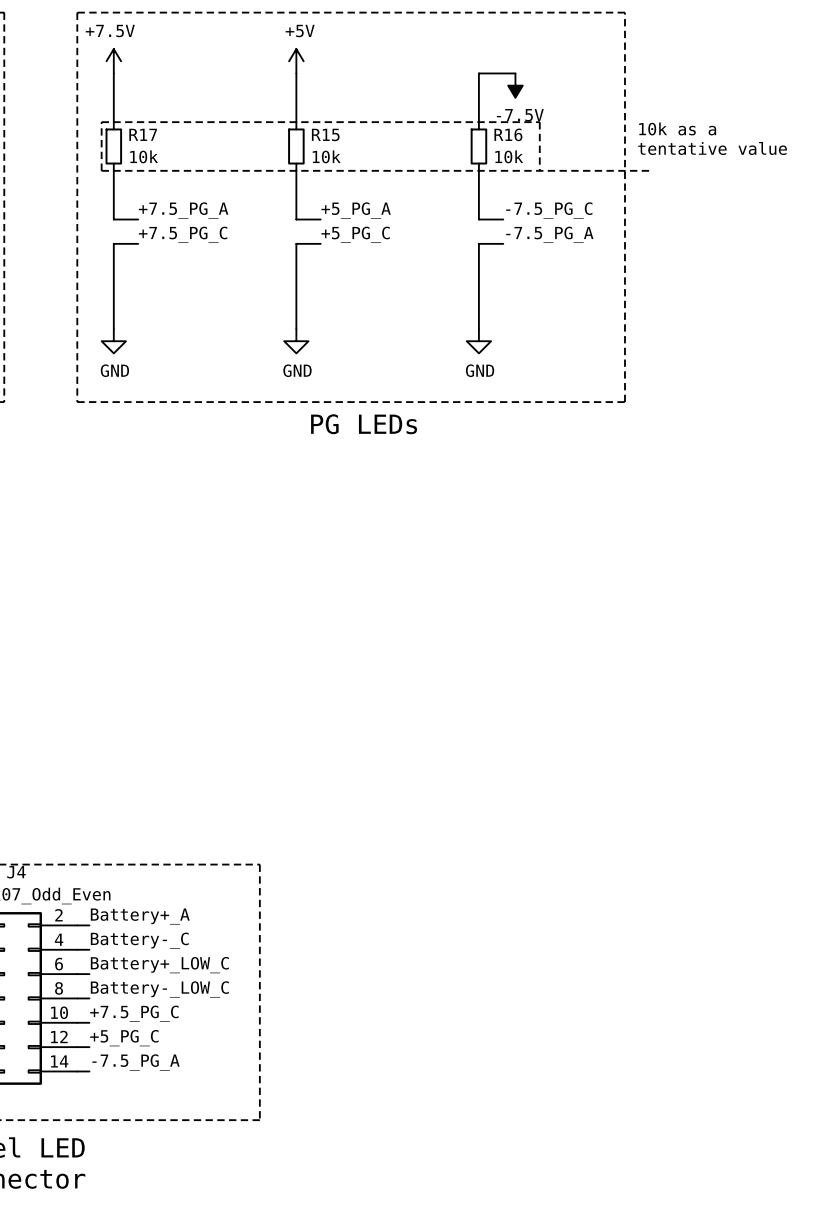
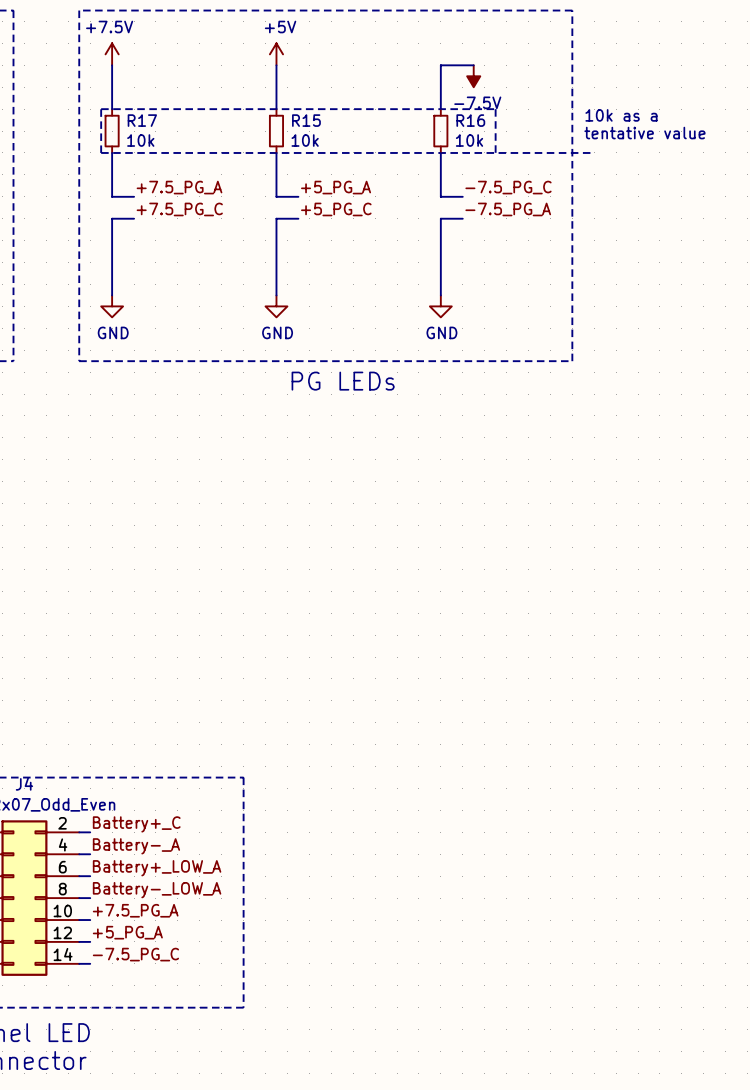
label: Battery+_A (140, 916) -> Battery+_C (136, 824)
label: Battery-_C (139, 940) -> Battery-_A (136, 846)
label: Battery+_LOW_C (159, 965) -> Battery+_LOW_A (157, 868)
label: Battery-_LOW_C (159, 989) -> Battery-_LOW_A (157, 890)
label: +7.5_PG_C (134, 1013) -> +7.5_PG_A (135, 910)
label: +5_PG_C (124, 1038) -> +5_PG_A (127, 932)
label: -7.5_PG_A (135, 1062) -> -7.5_PG_C (135, 954)

